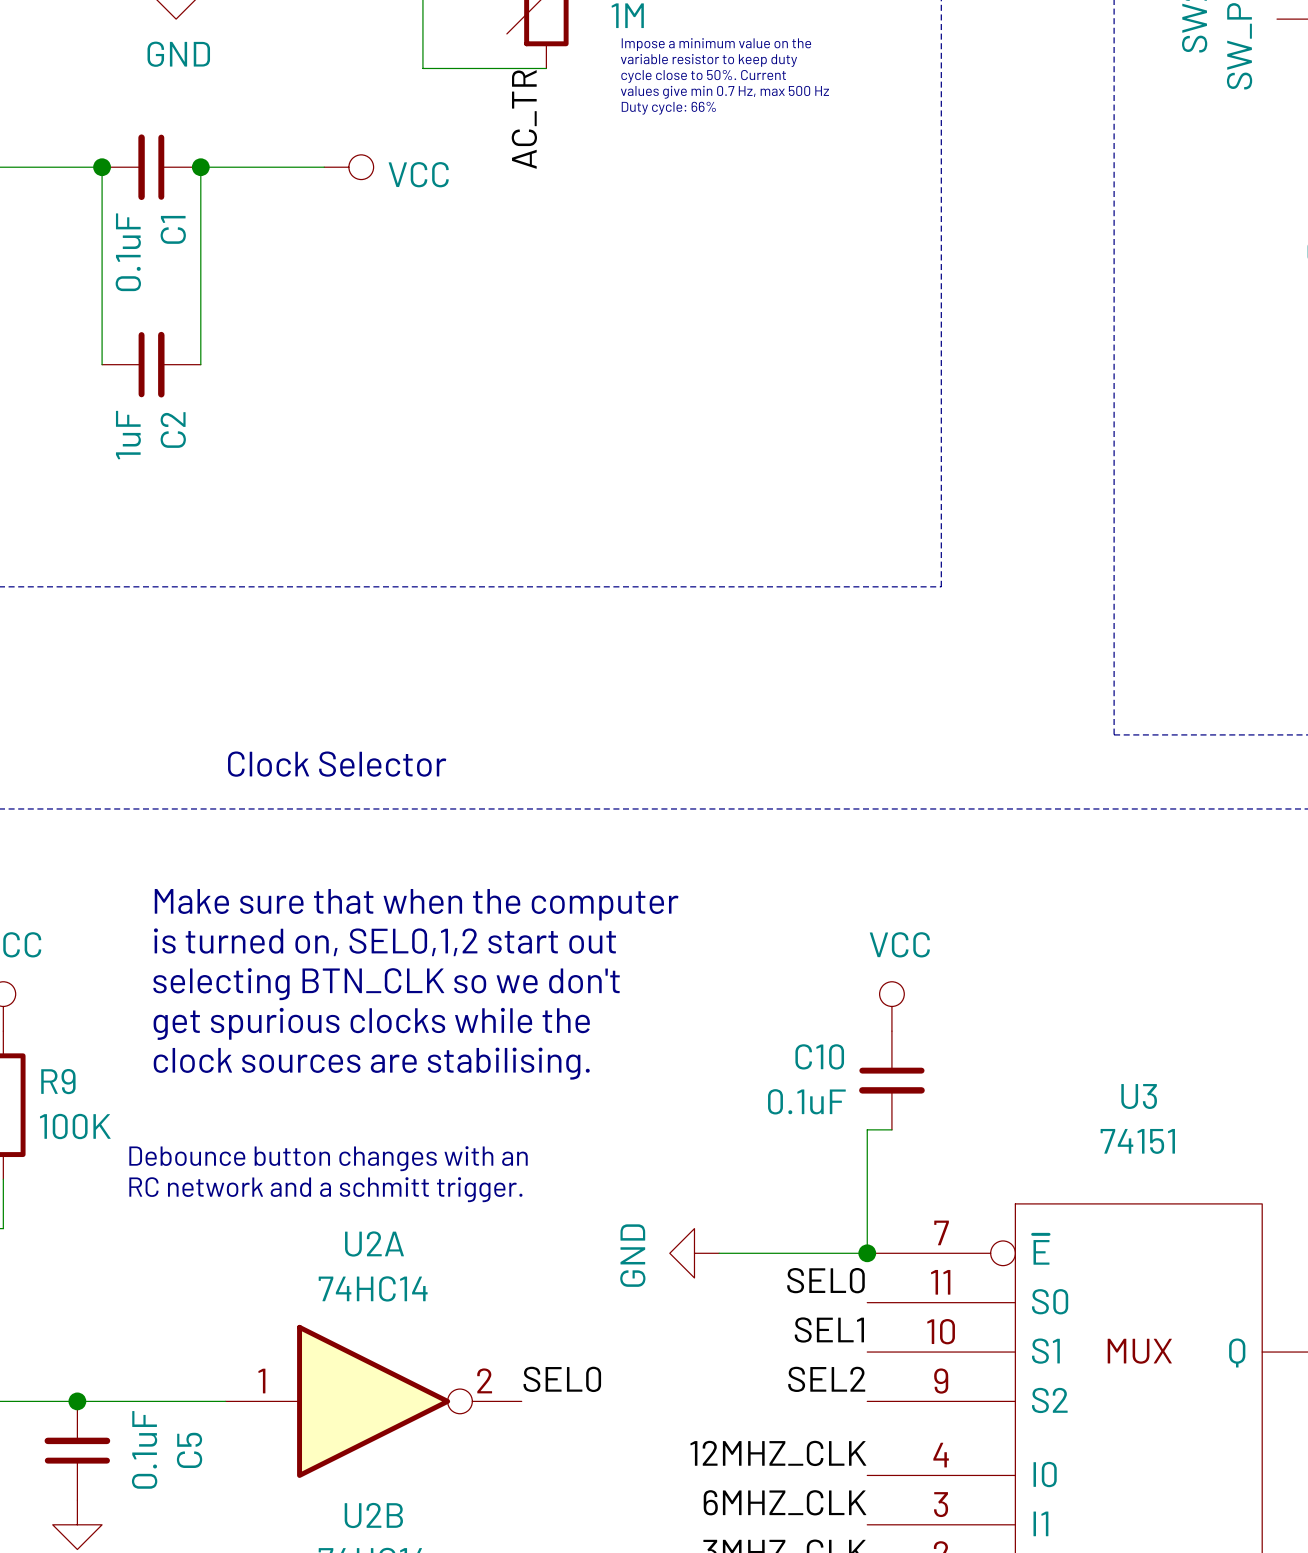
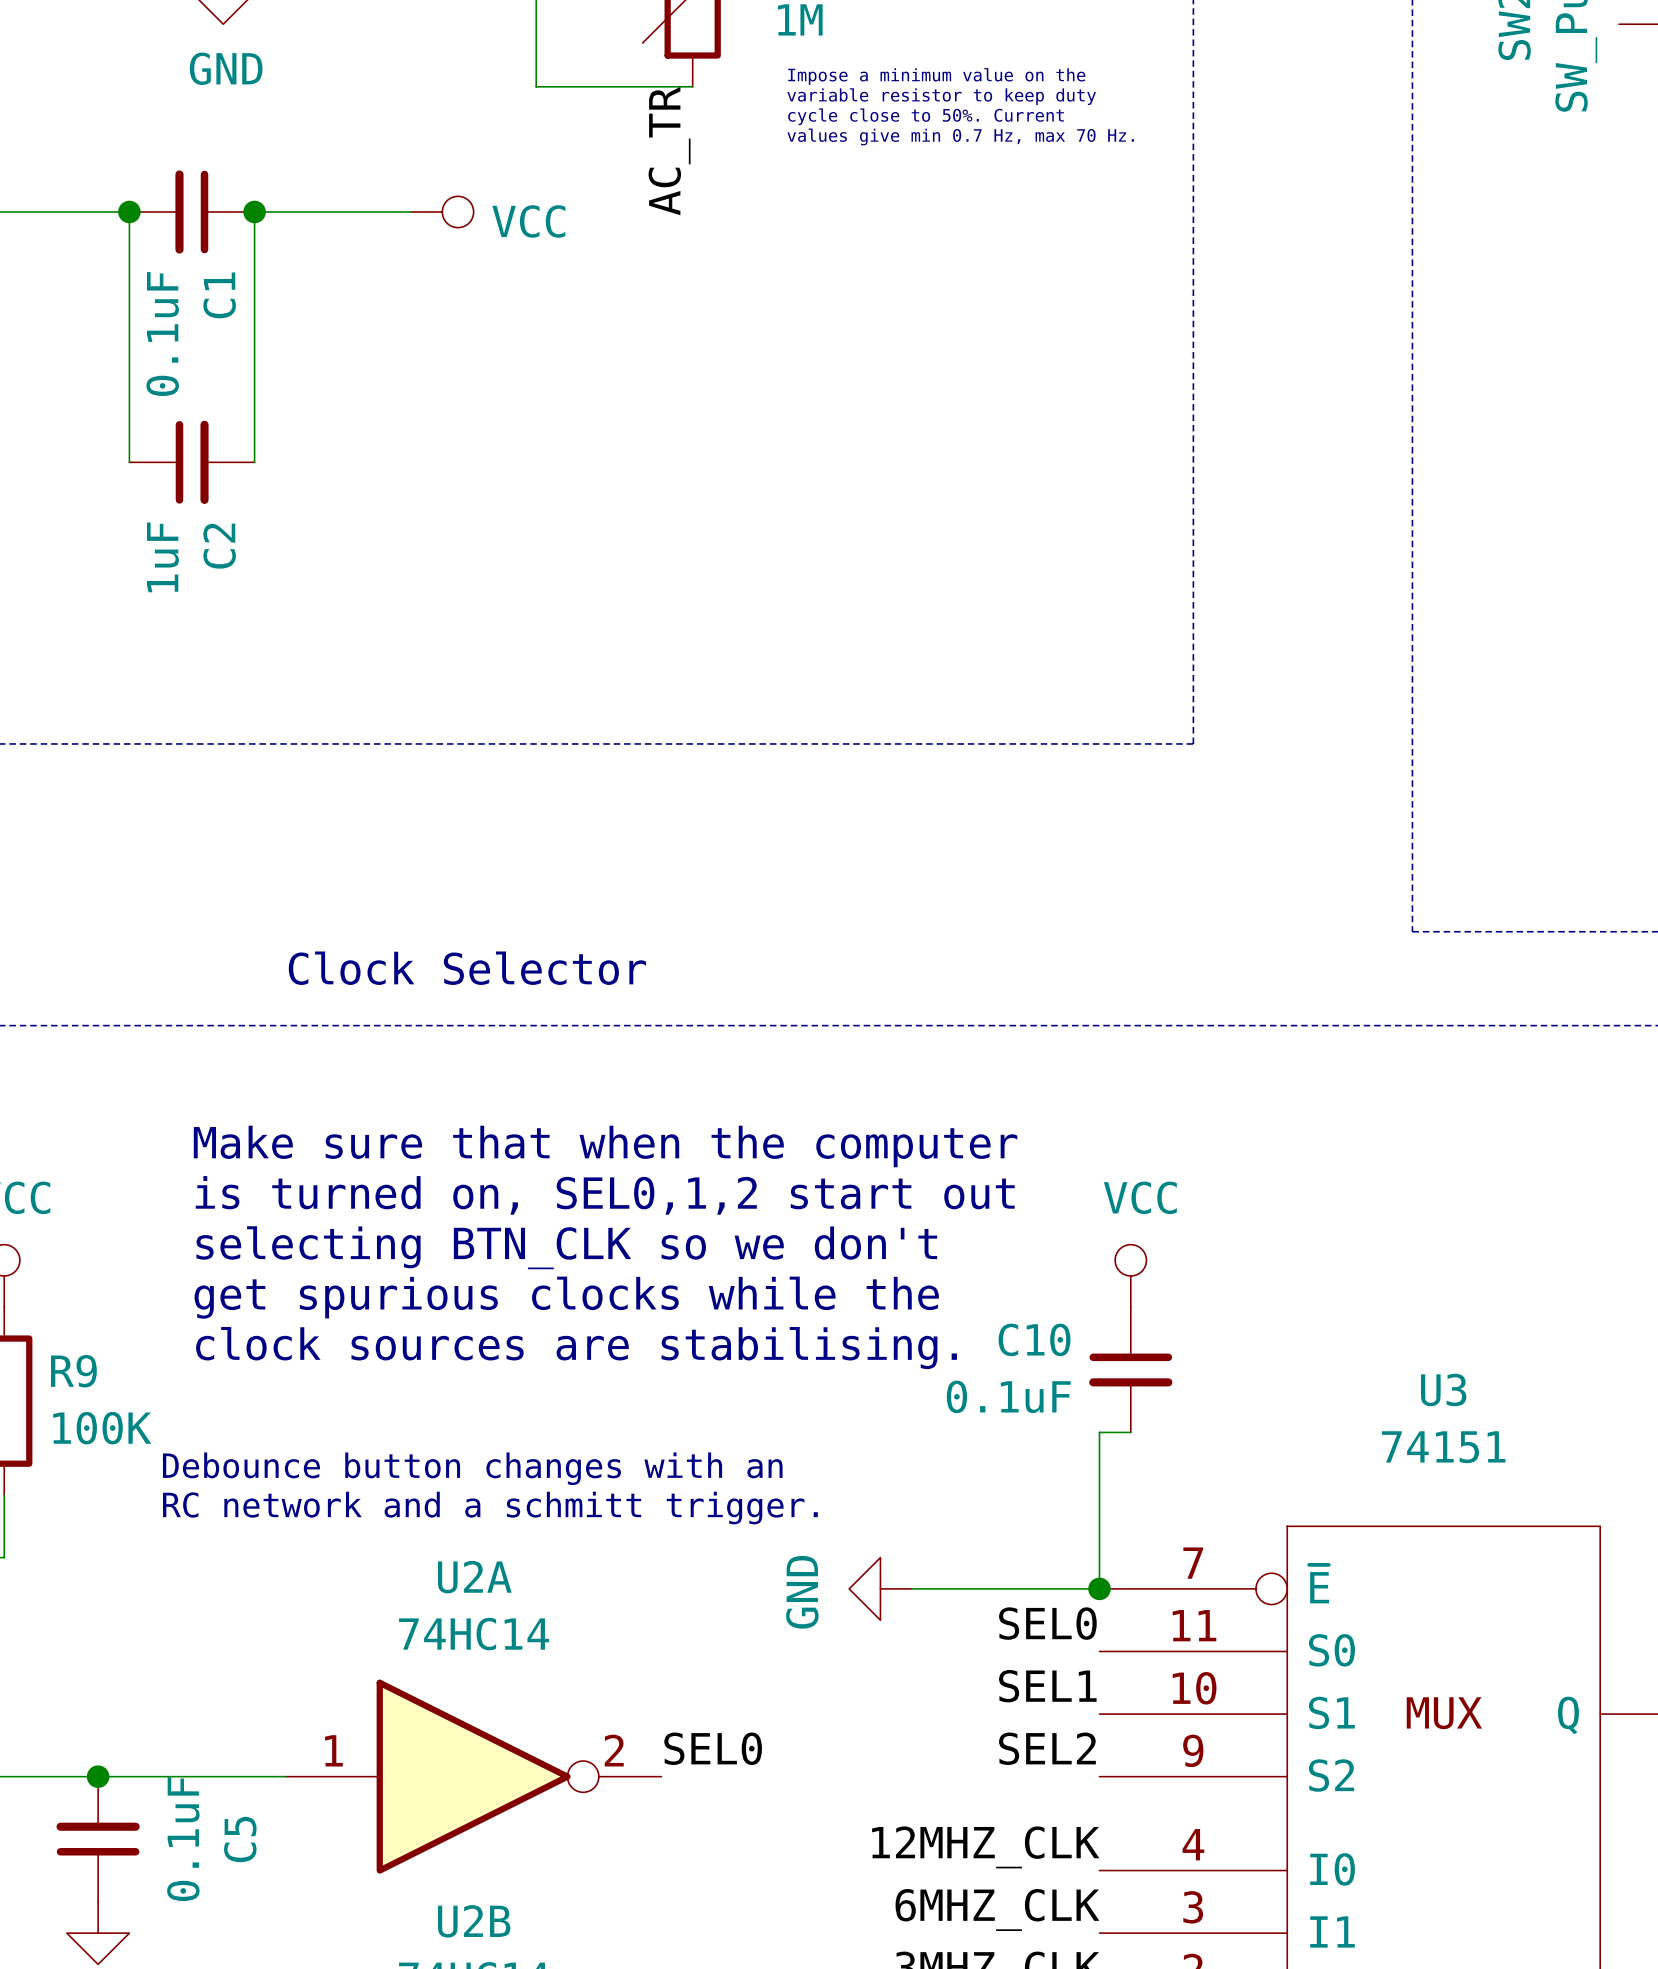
text position: Impose a minimum value on the (716, 44) -> Impose a minimum value on the (936, 76)
text position: variable resistor to keep duty (708, 60) -> variable resistor to keep duty (941, 96)
text position: cycle close to 50%. Current (703, 76) -> cycle close to 50%. Current (926, 116)
text: values give min 0.7 Hz, max 500 Hz (724, 92) -> none
text: Duty cycle: 66% (668, 108) -> values give min 0.7 Hz, max 70 Hz. (960, 136)

